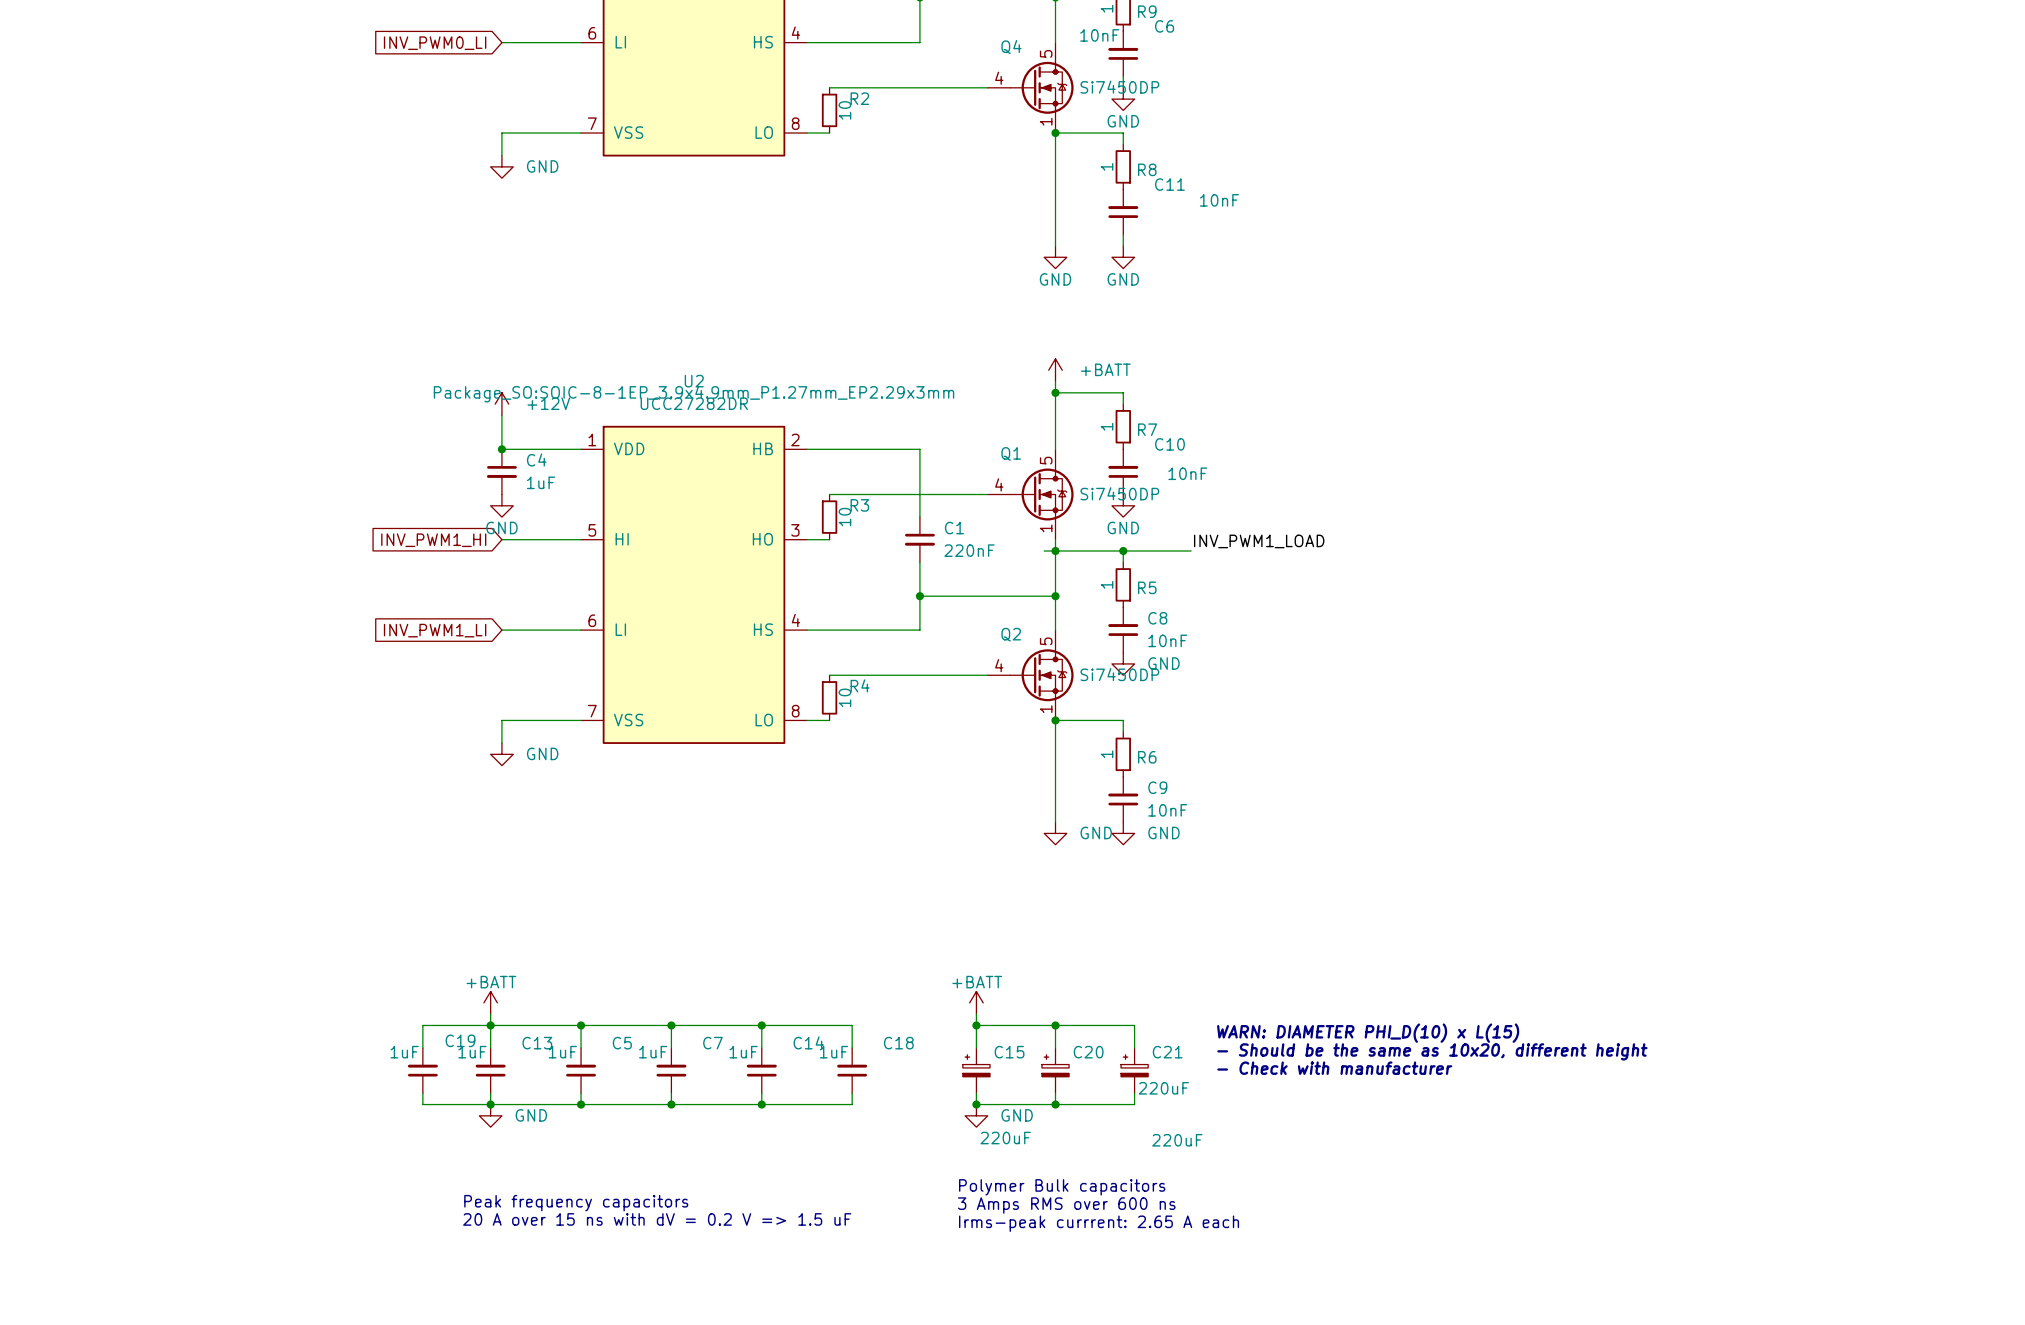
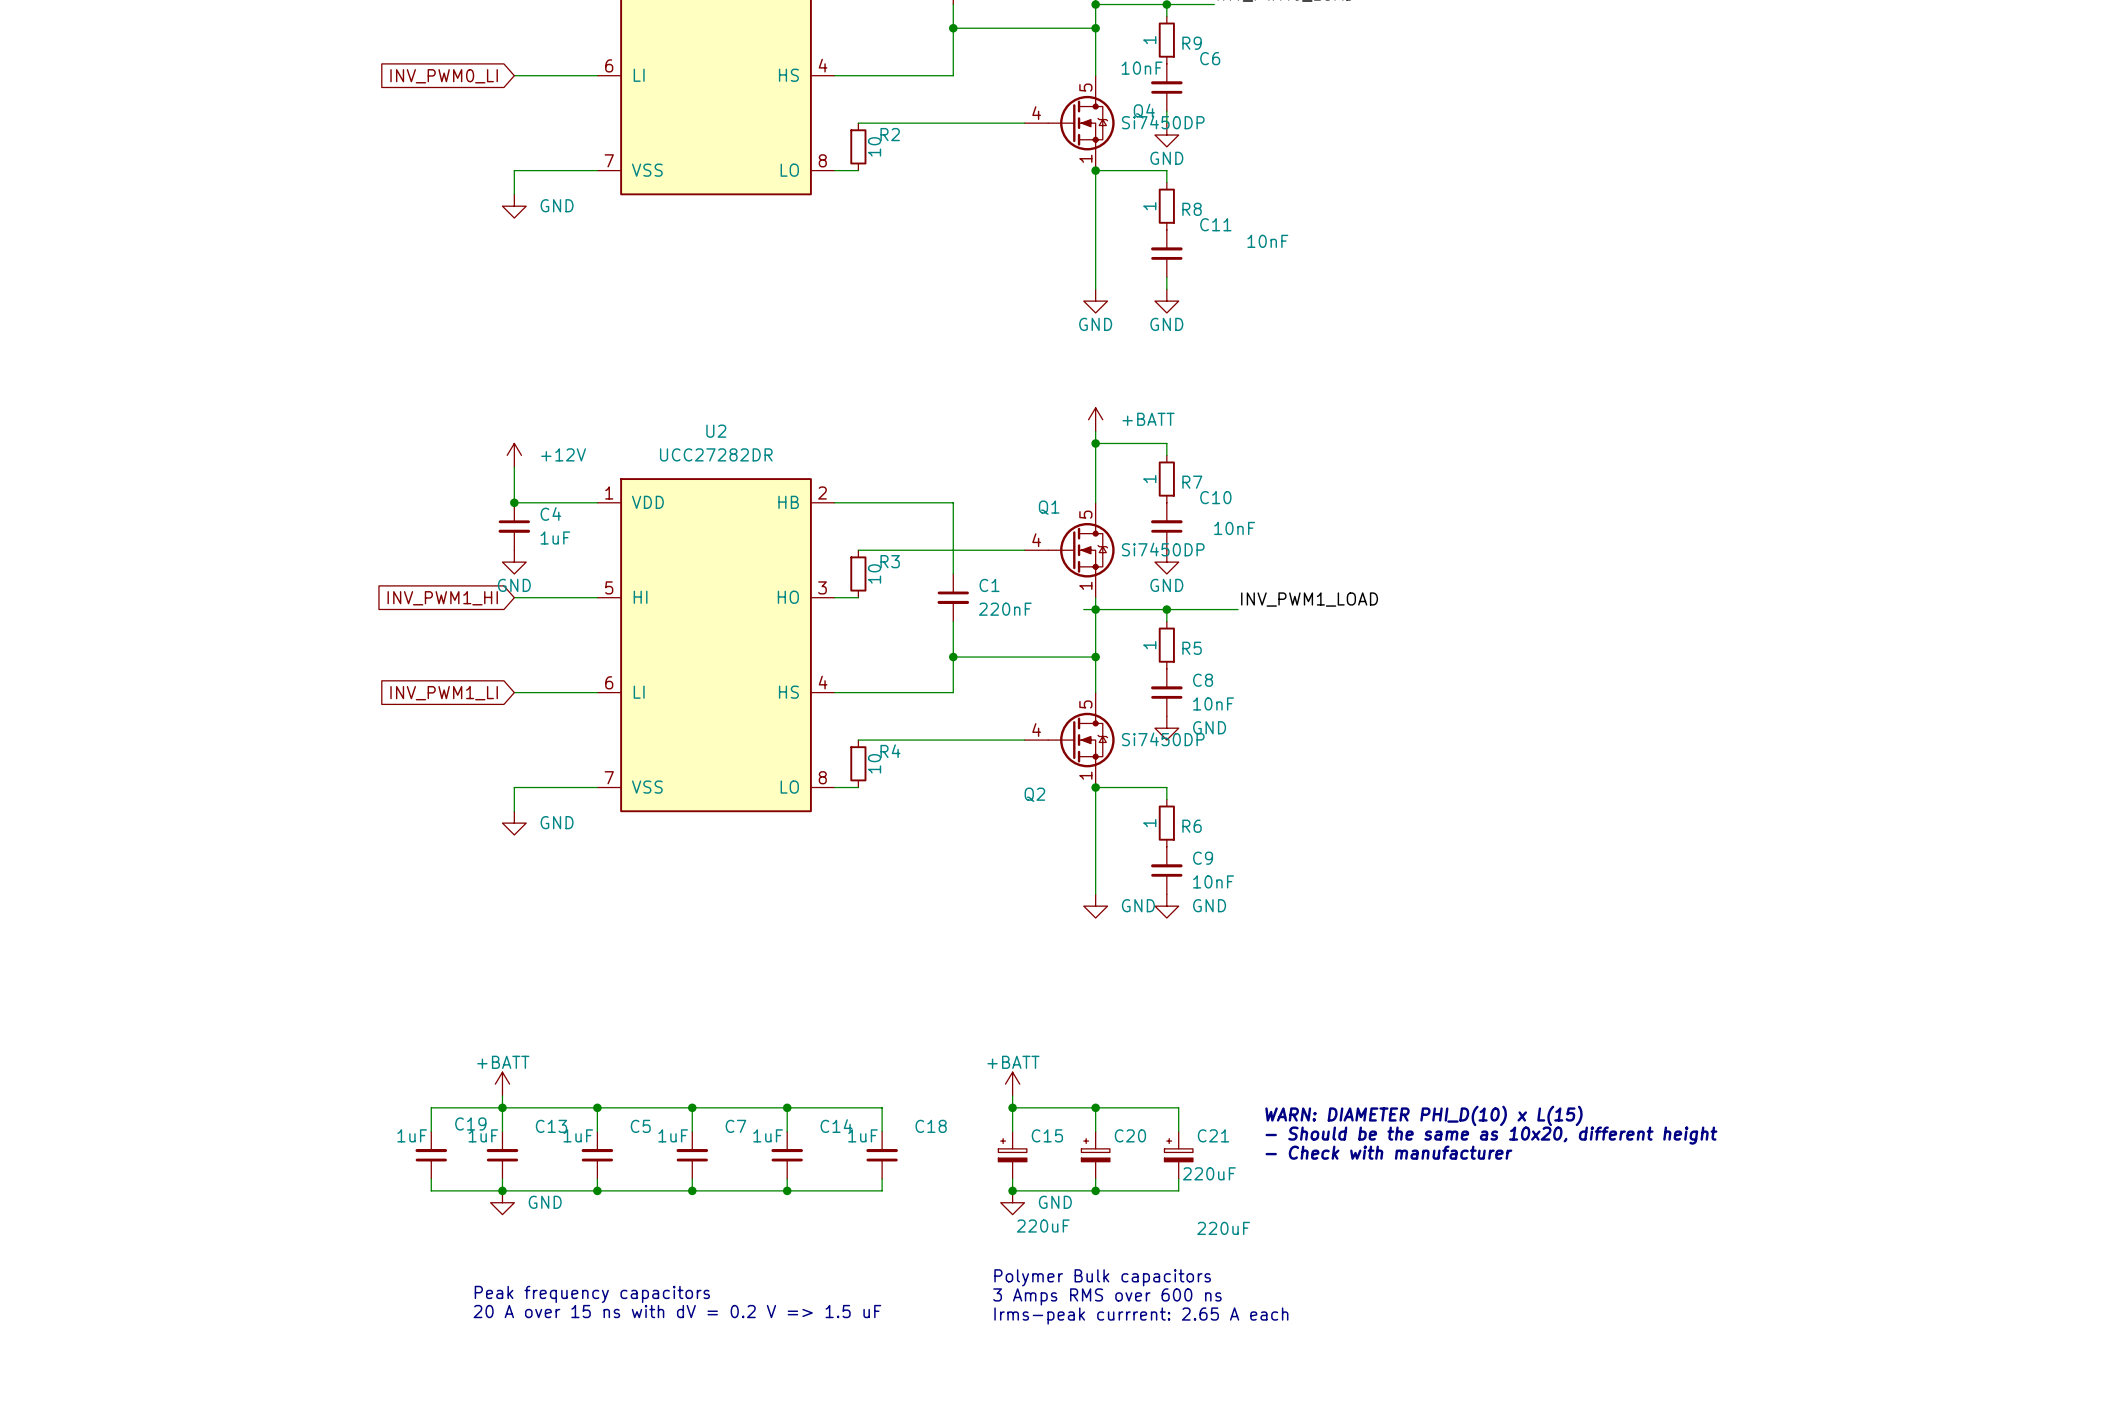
Q4 name position: Q4 (1011, 46) -> Q4 (1144, 111)
U2 text: Package_SO:SOIC-8-1EP_3.9x4.9mm_P1.27mm_EP2.29x3mm (694, 394) -> none
Q2 name position: Q2 (1011, 634) -> Q2 (1034, 794)

